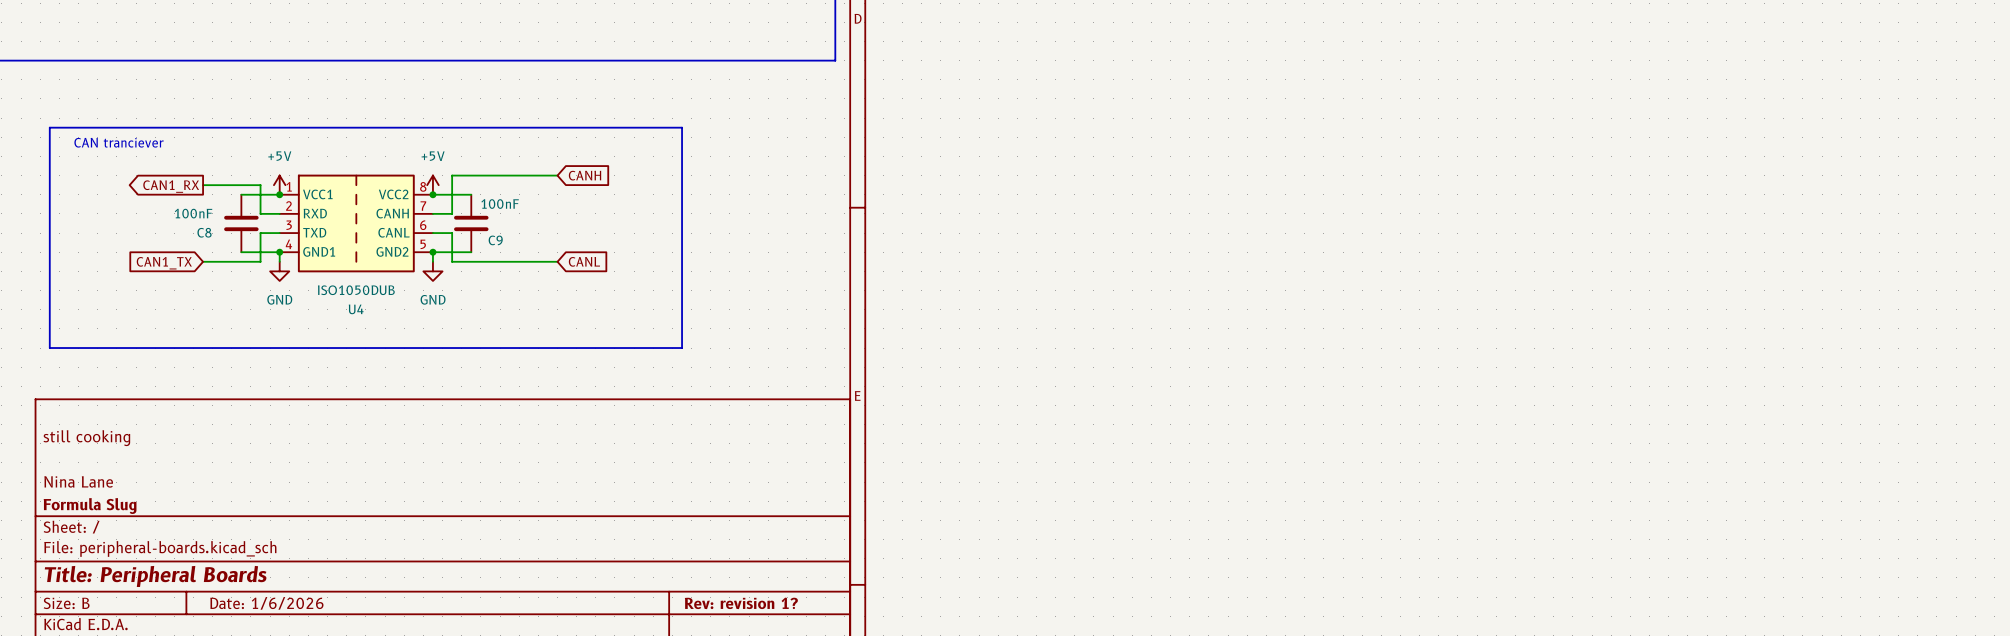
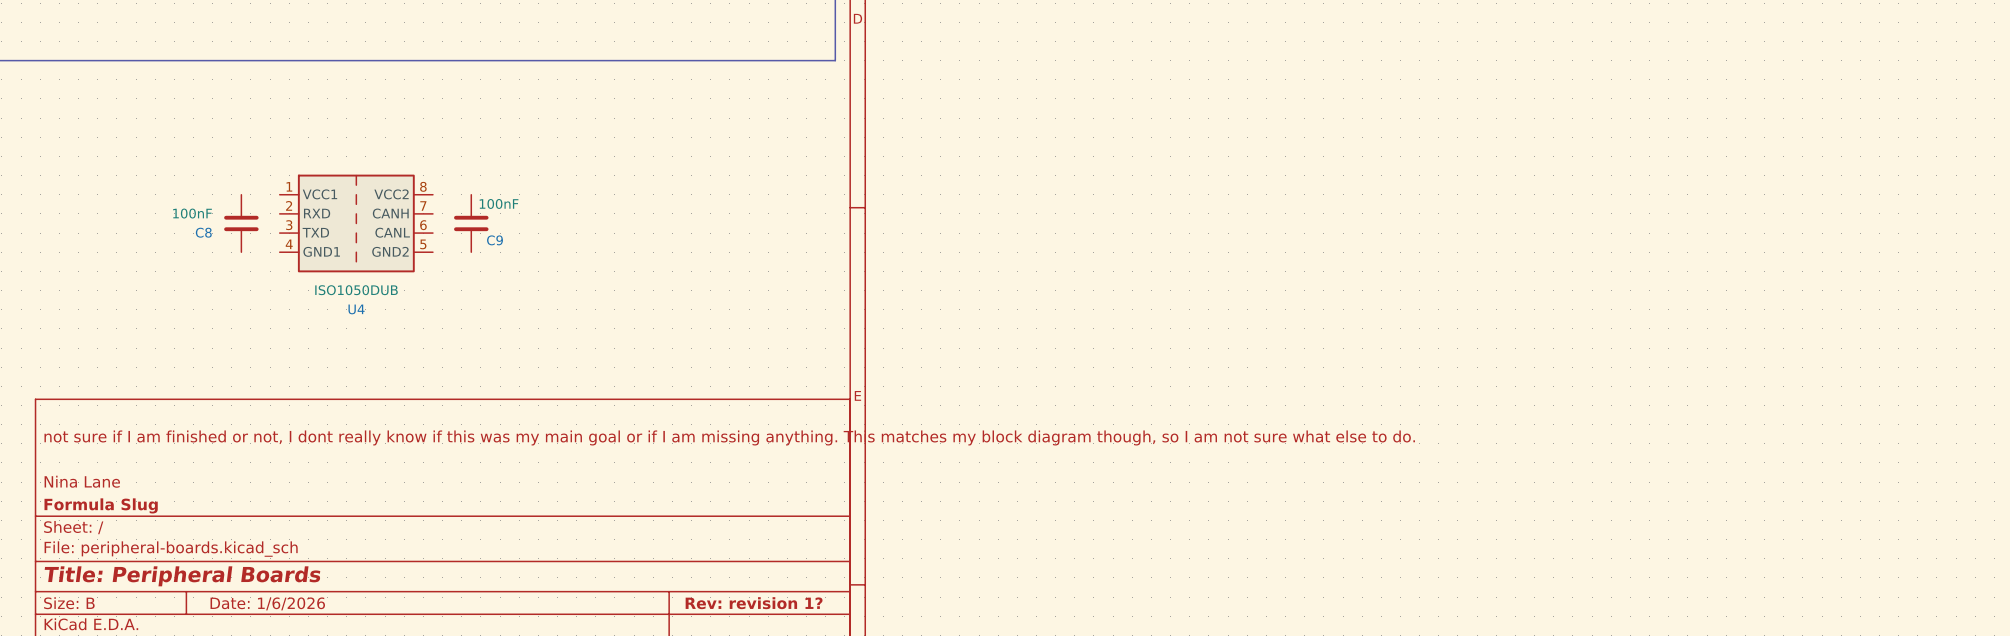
line: (49, 127) (682, 127) (682, 348) (49, 348) (49, 127) -> none
text: CAN tranciever (119, 142) -> none
wire: (557, 175) (452, 175) (452, 213) (432, 213) -> none
global label: CANH (585, 175) -> none
wire: (203, 185) (260, 185) (260, 213) (279, 213) -> none
power symbol: +5V (279, 185) -> none
power symbol: +5V (432, 185) -> none
global label: CAN1_RX (171, 186) -> none
wire: (241, 194) (279, 194) -> none
junction: (279, 194) -> none
wire: (432, 194) (471, 194) -> none
junction: (432, 194) -> none
wire: (279, 233) (260, 233) (260, 261) (203, 261) -> none
wire: (432, 233) (452, 233) (452, 261) (557, 261) -> none
wire: (241, 252) (279, 252) (279, 261) -> none
junction: (279, 252) -> none
junction: (432, 252) -> none
wire: (471, 252) (432, 252) (432, 261) -> none
global label: CANL (584, 261) -> none
global label: CAN1_TX (164, 263) -> none
power symbol: GND (279, 271) -> none
power symbol: GND (432, 271) -> none
title block: still cooking (86, 438) -> not sure if I am finished or not, I dont really know if this was my main goal or if I am missing anything. This matches my block diagram though, so I am not sure what else to do. (729, 437)

